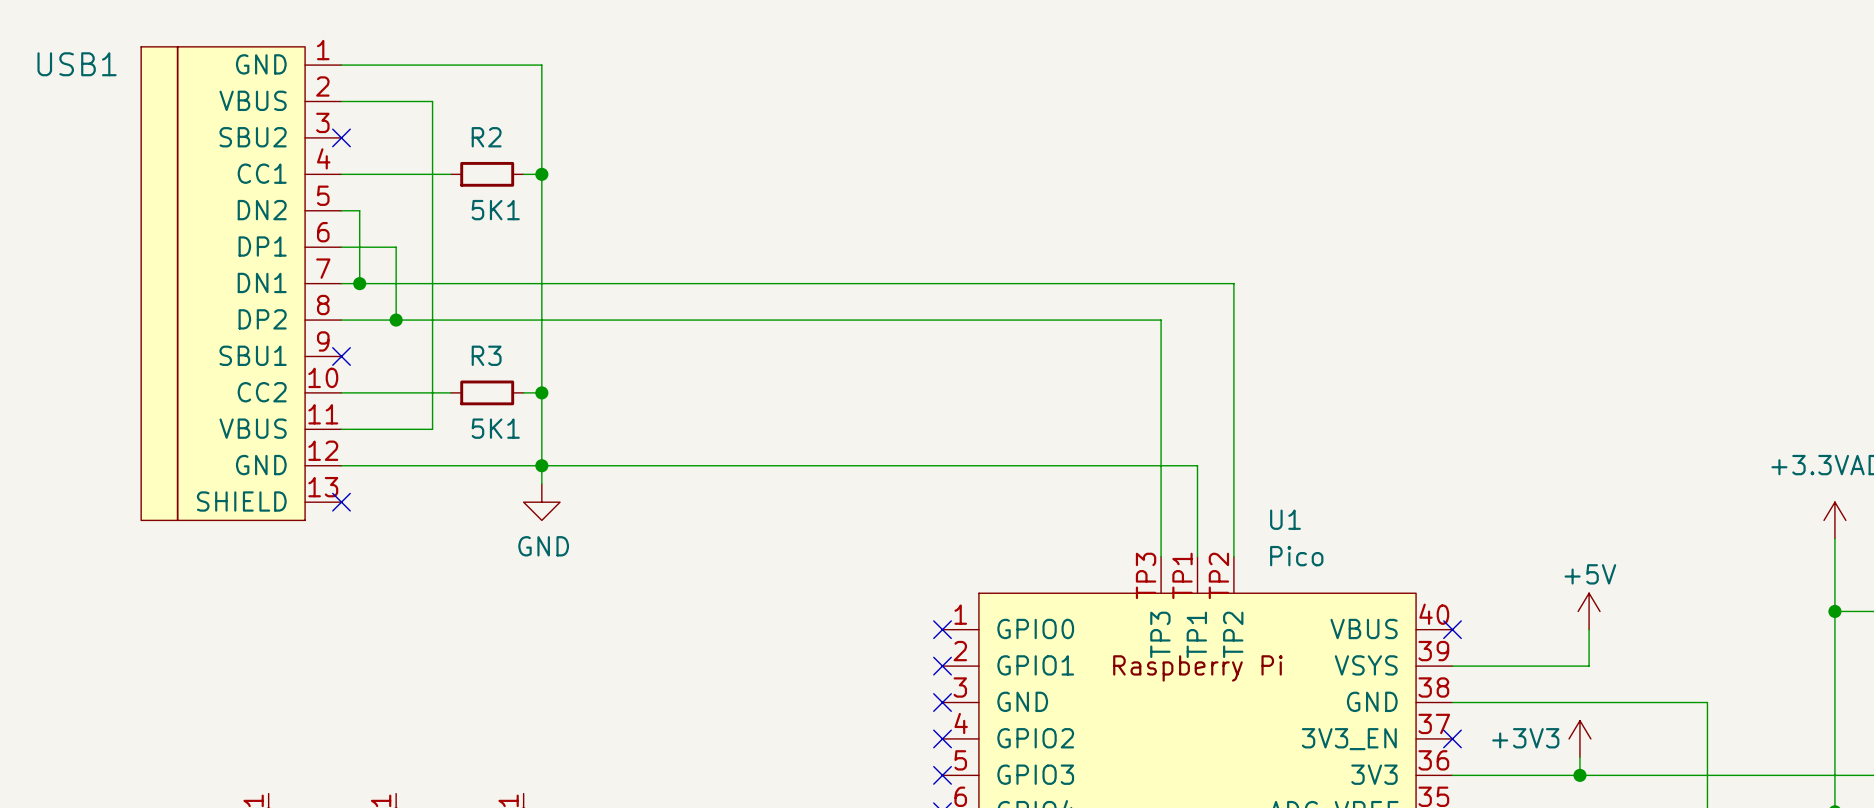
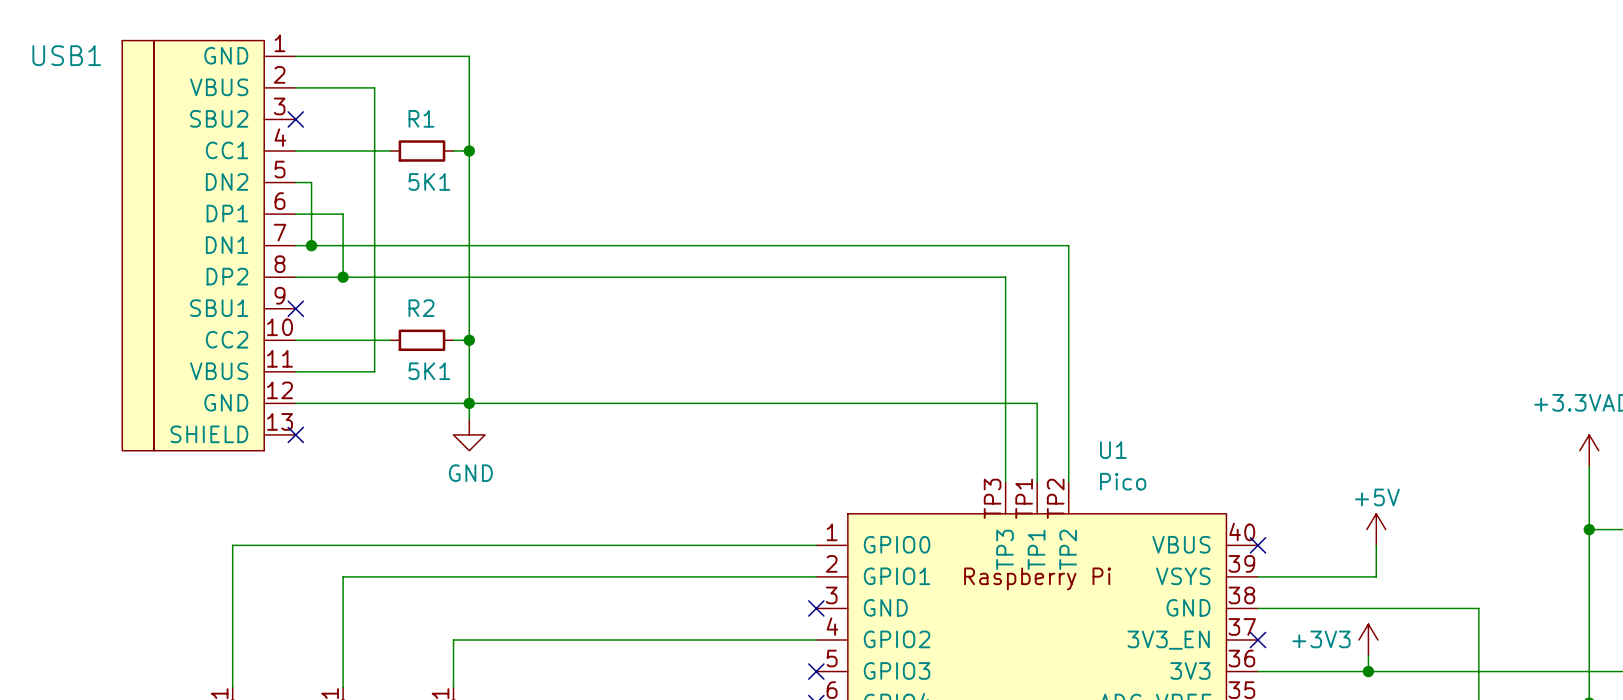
R2 name: R2 (486, 137) -> R1 (421, 118)
R3 name: R3 (486, 355) -> R2 (421, 308)
wire: none -> (816, 545) (232, 545) (232, 687)
no-connect mark: (942, 629) -> none
wire: none -> (816, 576) (343, 576) (343, 687)
no-connect mark: (942, 666) -> none
wire: none -> (816, 640) (453, 640) (453, 687)
no-connect mark: (942, 738) -> none

